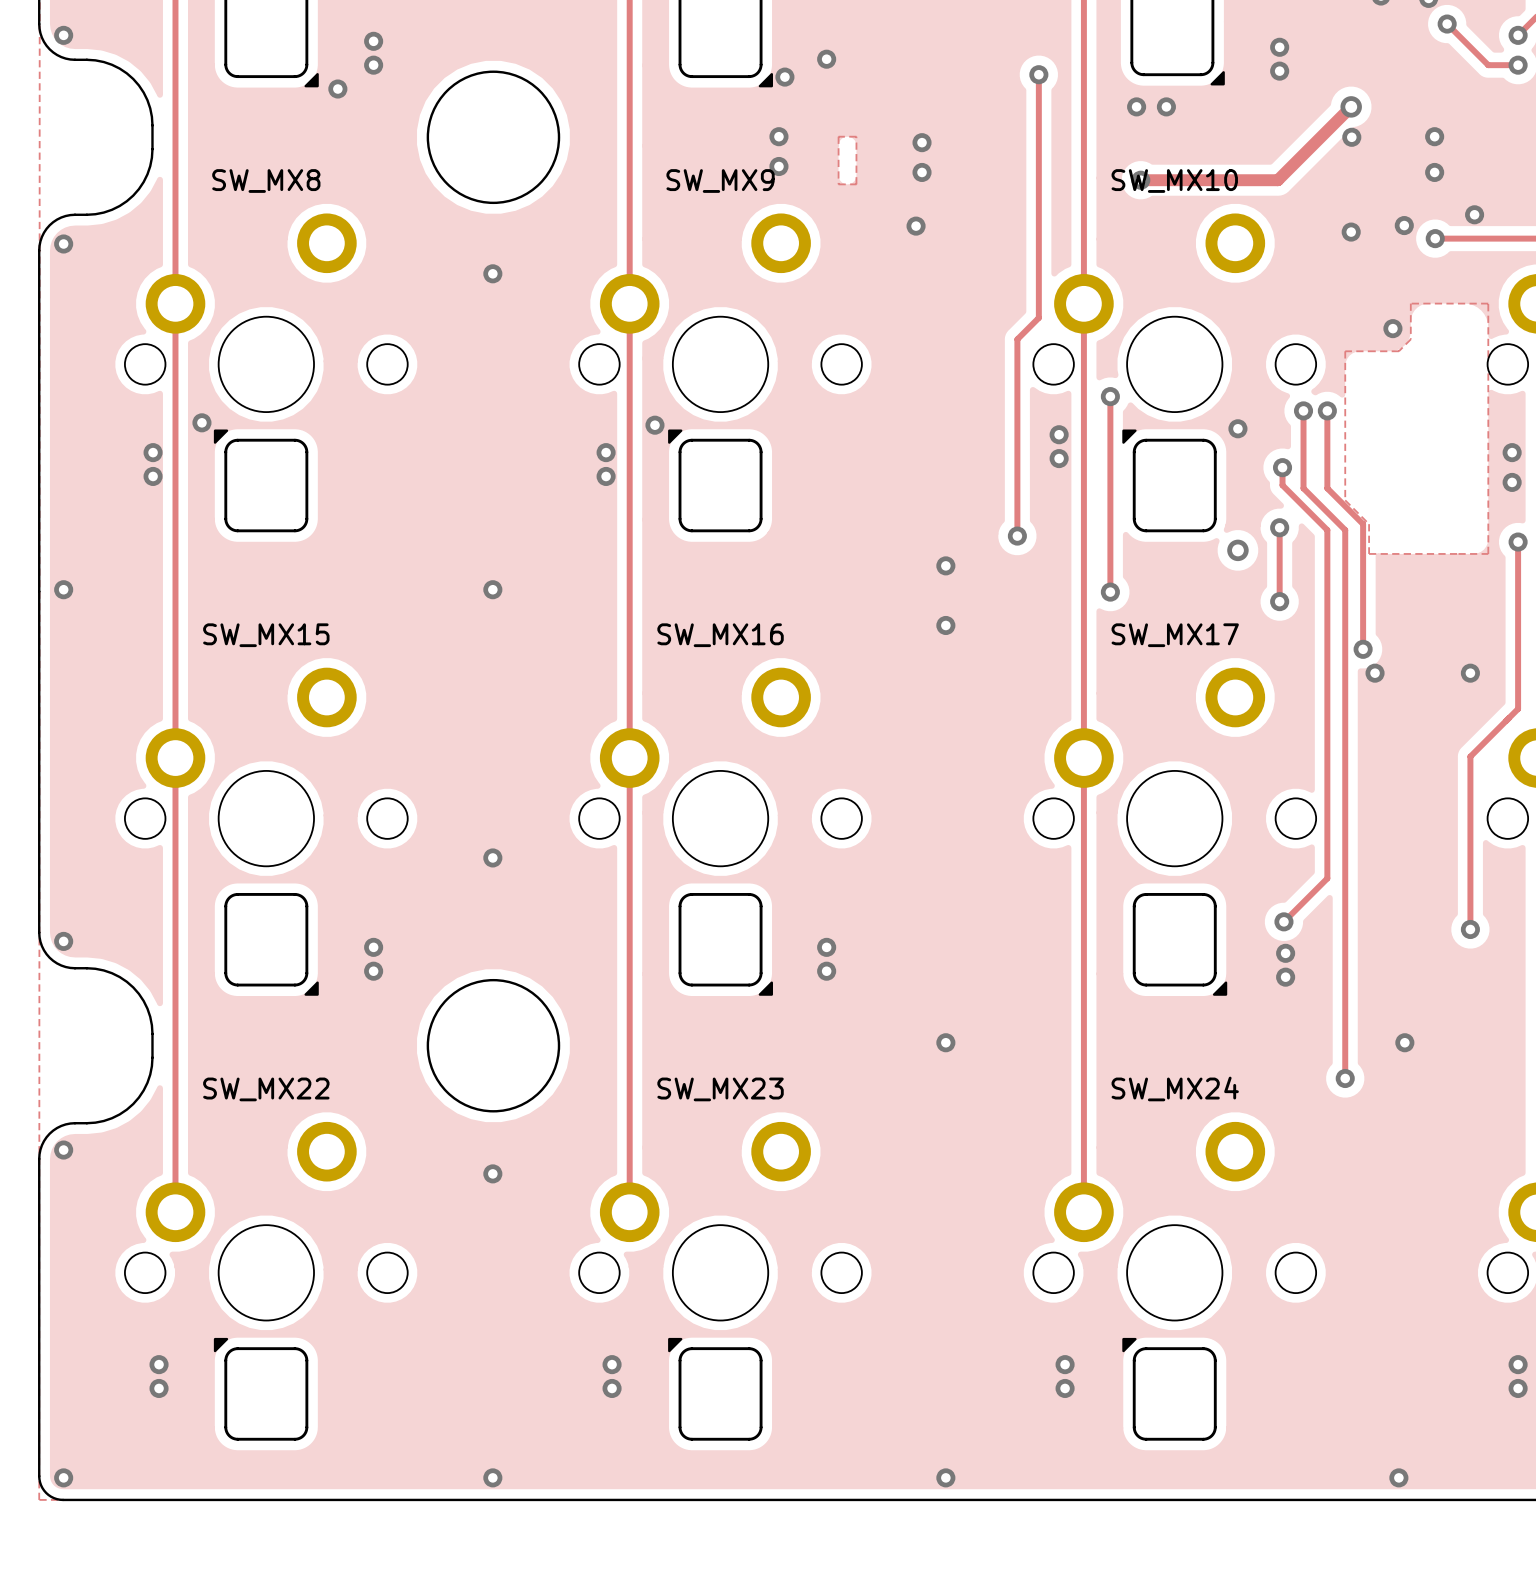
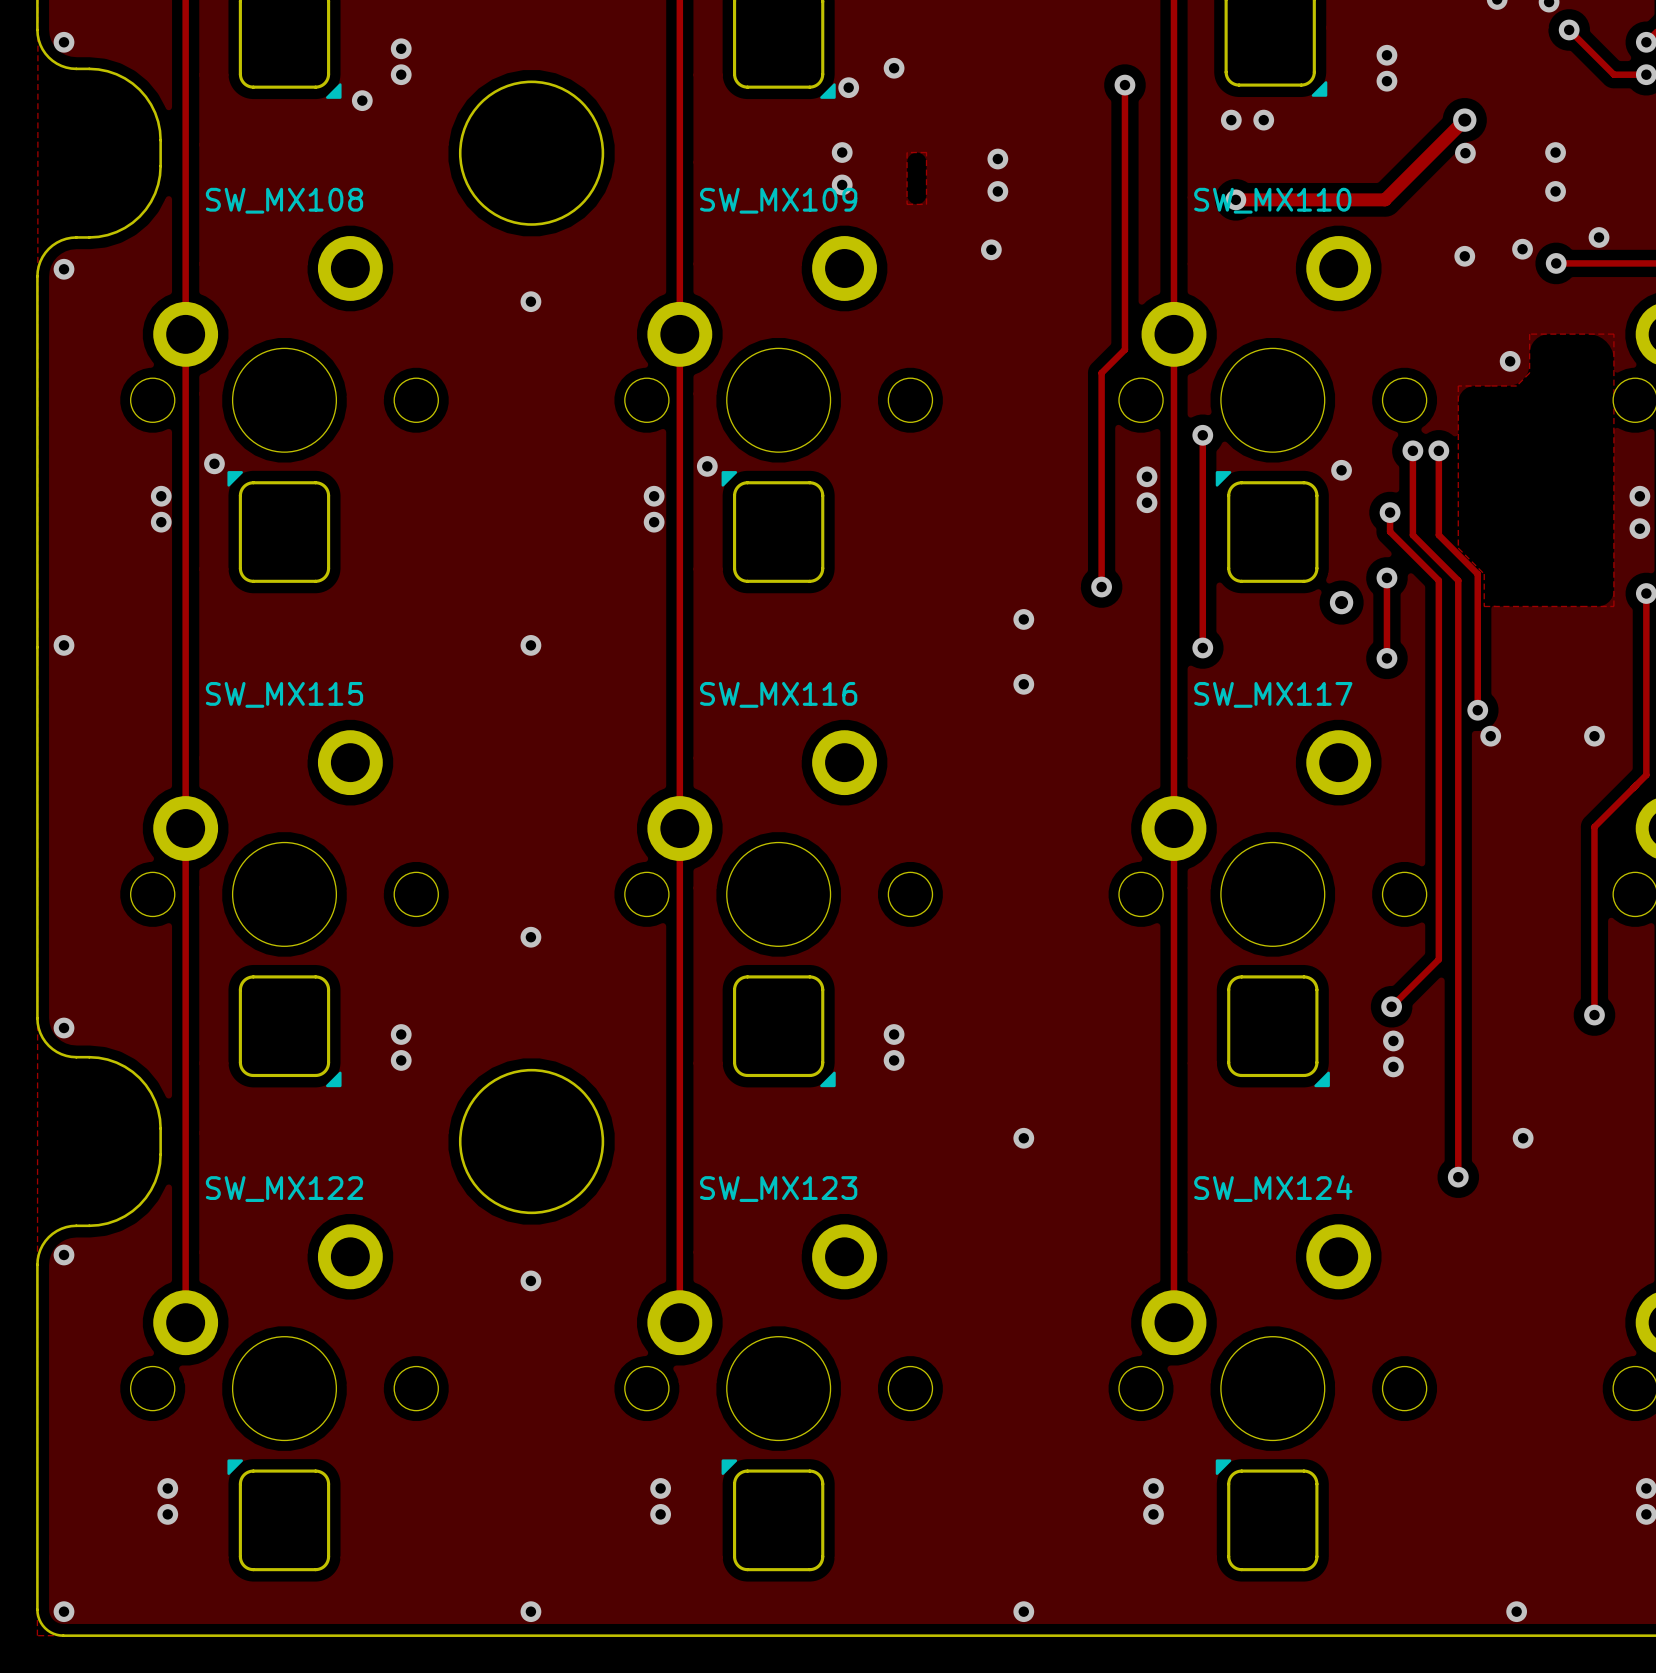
SW_MX8 name: SW_MX8 (266, 181) -> SW_MX108 (284, 200)
SW_MX9 name: SW_MX9 (720, 181) -> SW_MX109 (778, 200)
SW_MX10 name: SW_MX10 (1174, 181) -> SW_MX110 (1272, 200)
SW_MX15 name: SW_MX15 (266, 635) -> SW_MX115 (284, 694)
SW_MX16 name: SW_MX16 (720, 635) -> SW_MX116 (778, 694)
SW_MX17 name: SW_MX17 (1175, 635) -> SW_MX117 (1273, 694)
SW_MX24 name: SW_MX24 (1175, 1088) -> SW_MX124 (1273, 1188)
SW_MX22 name: SW_MX22 (266, 1089) -> SW_MX122 (284, 1189)
SW_MX23 name: SW_MX23 (720, 1089) -> SW_MX123 (778, 1189)

